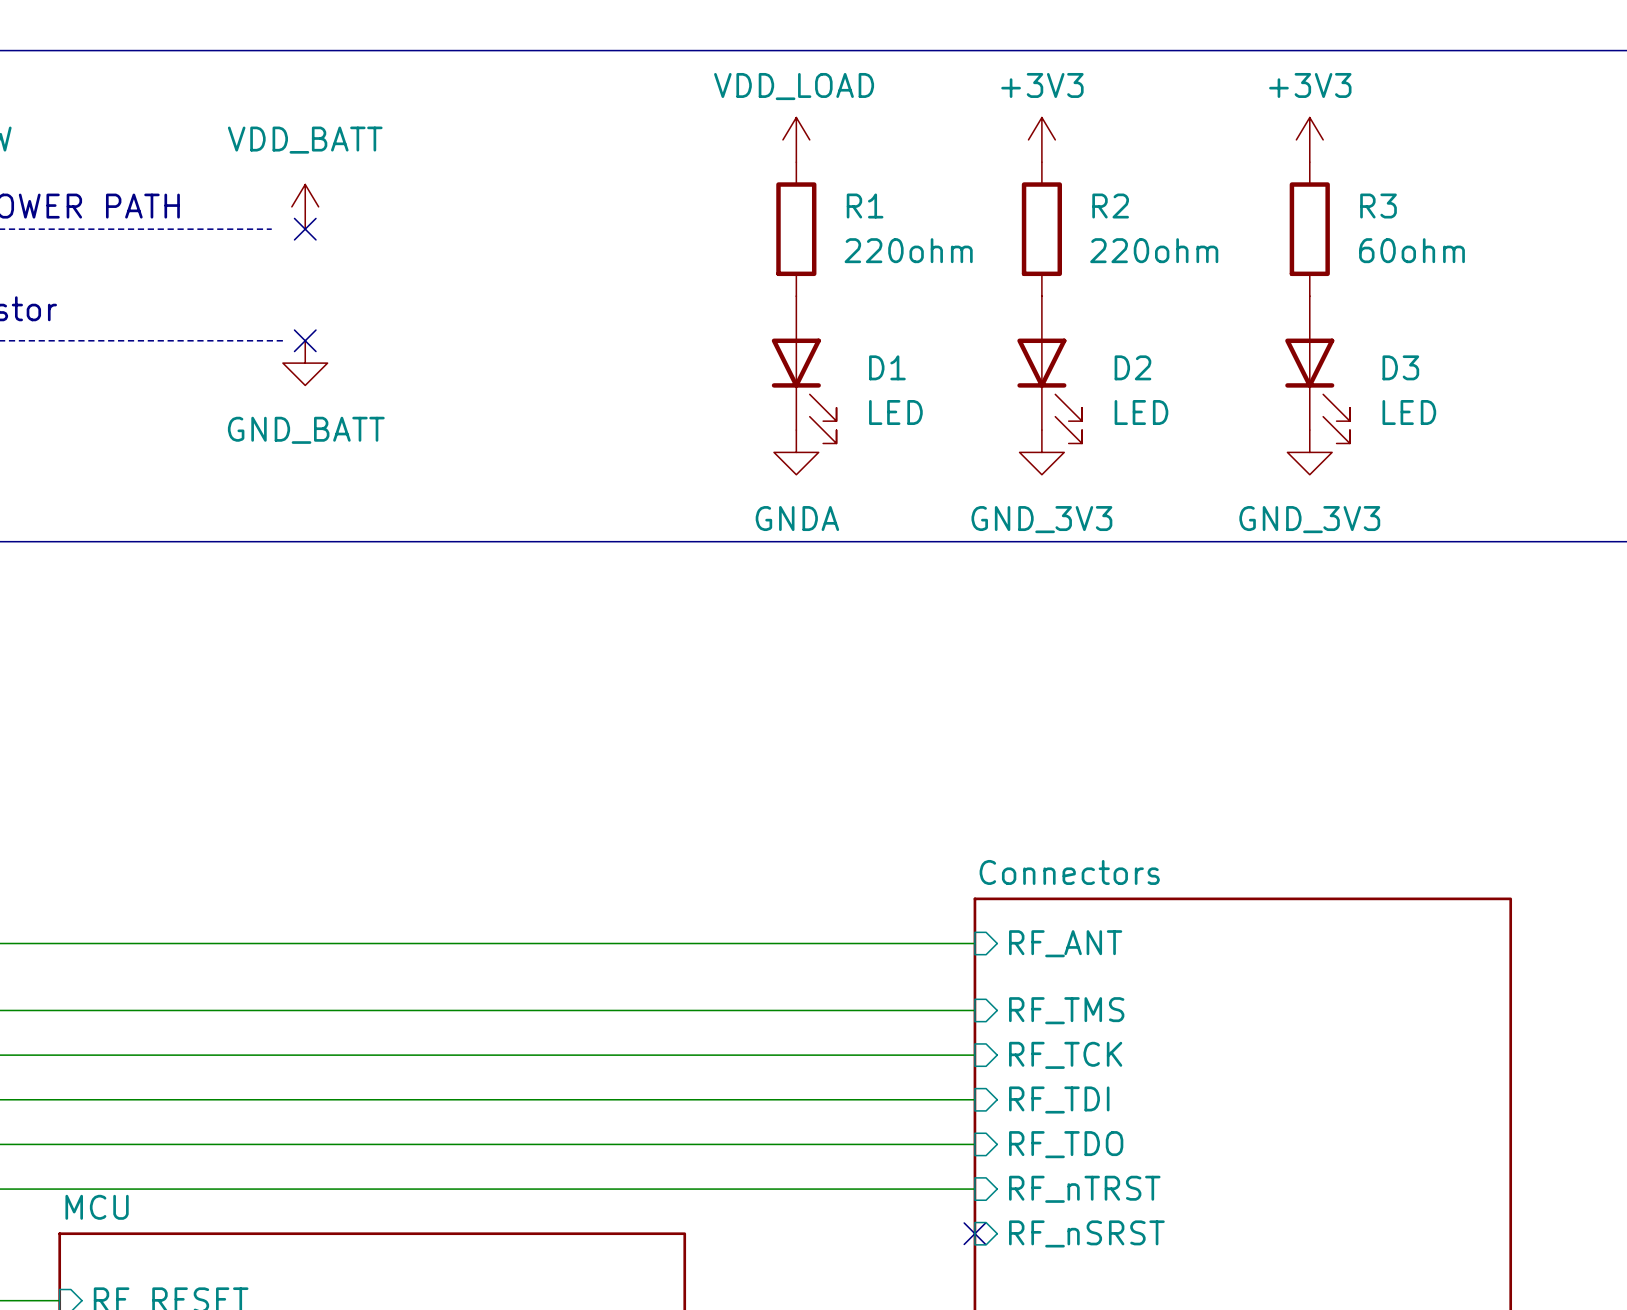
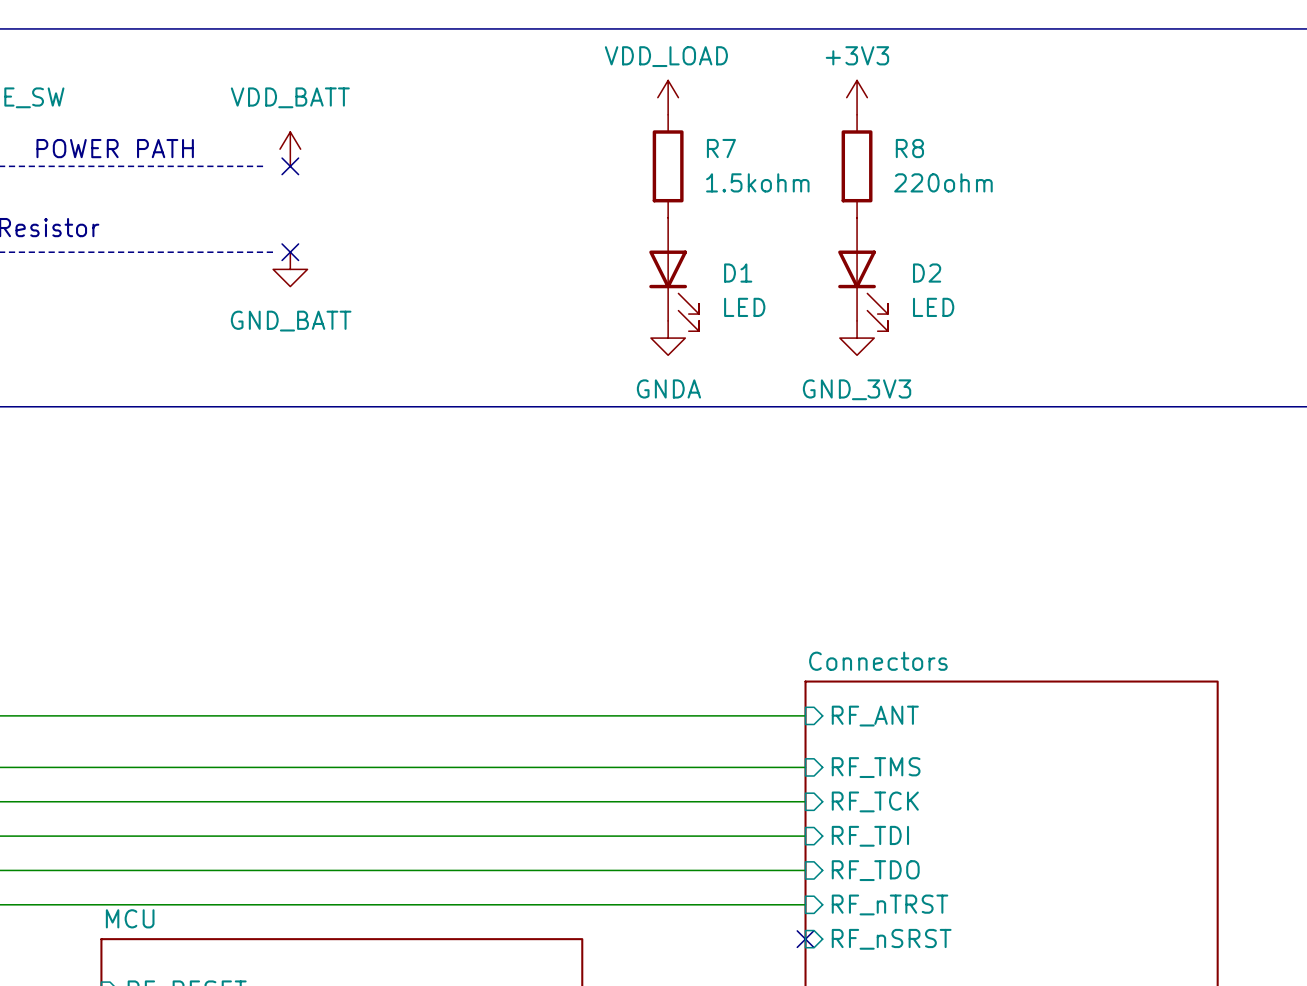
power symbol: +3V3 (1309, 139) -> none
R1 name: R1 (865, 206) -> R7 (721, 148)
R2 name: R2 (1110, 206) -> R8 (909, 148)
R3: 60ohm (1309, 229) -> none
R1 value: 220ohm (908, 250) -> 1.5kohm (757, 182)
D3: LED (1317, 369) -> none
power symbol: GND_3V3 (1309, 452) -> none

